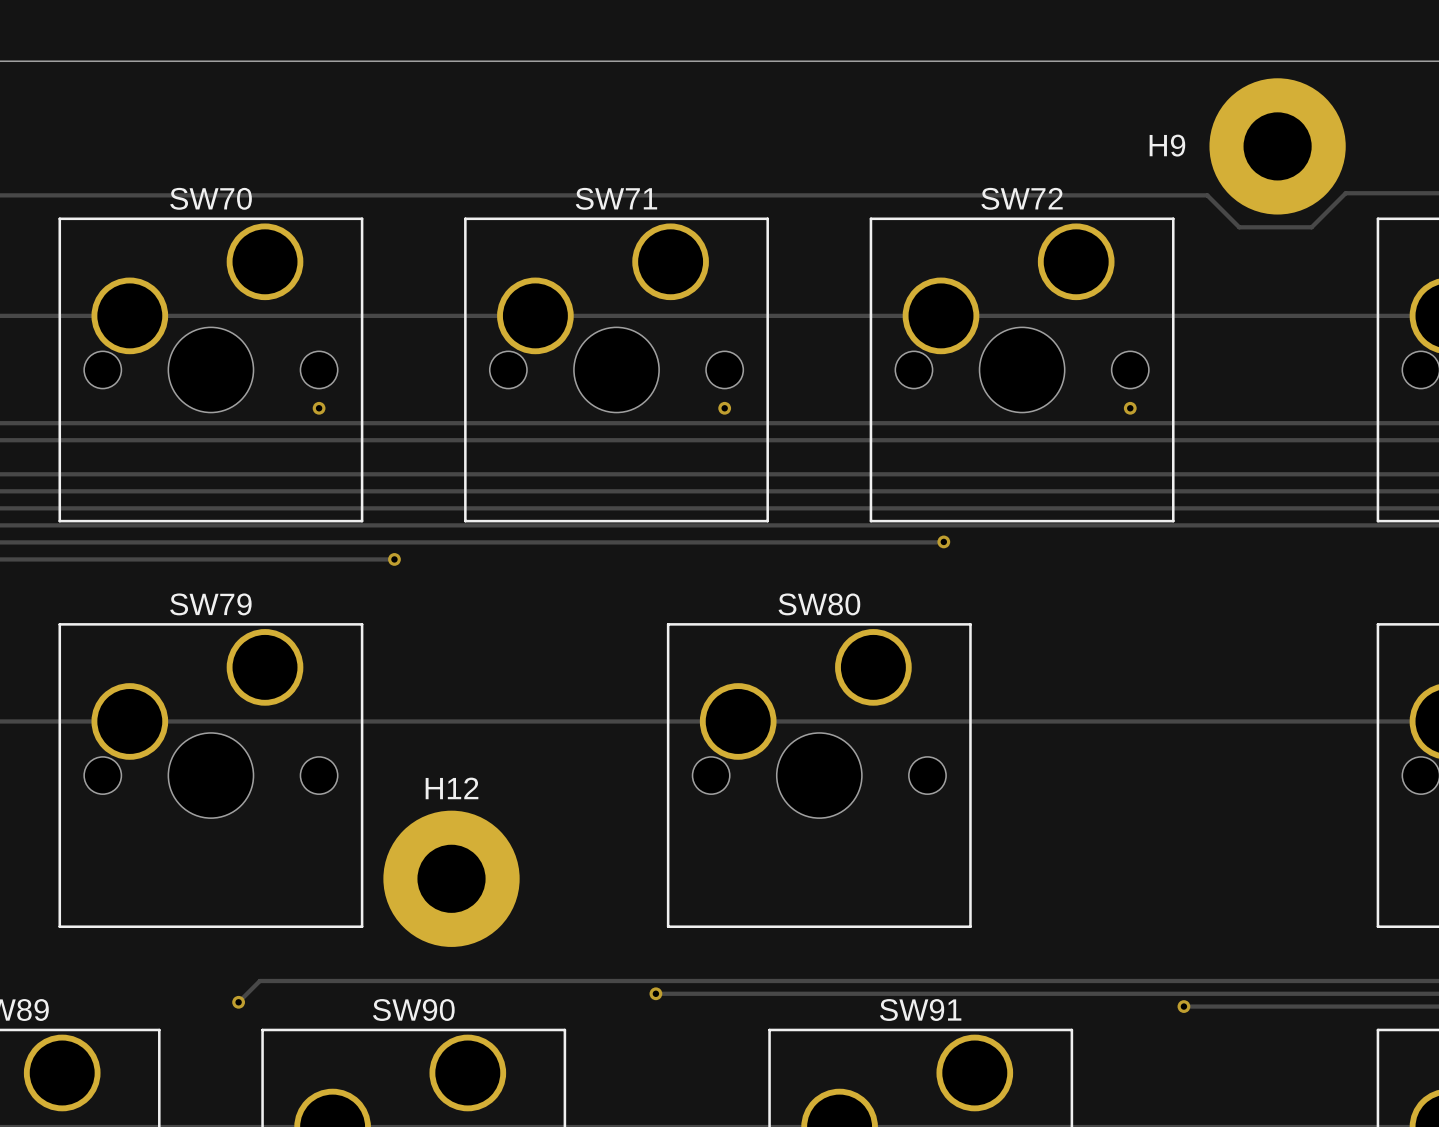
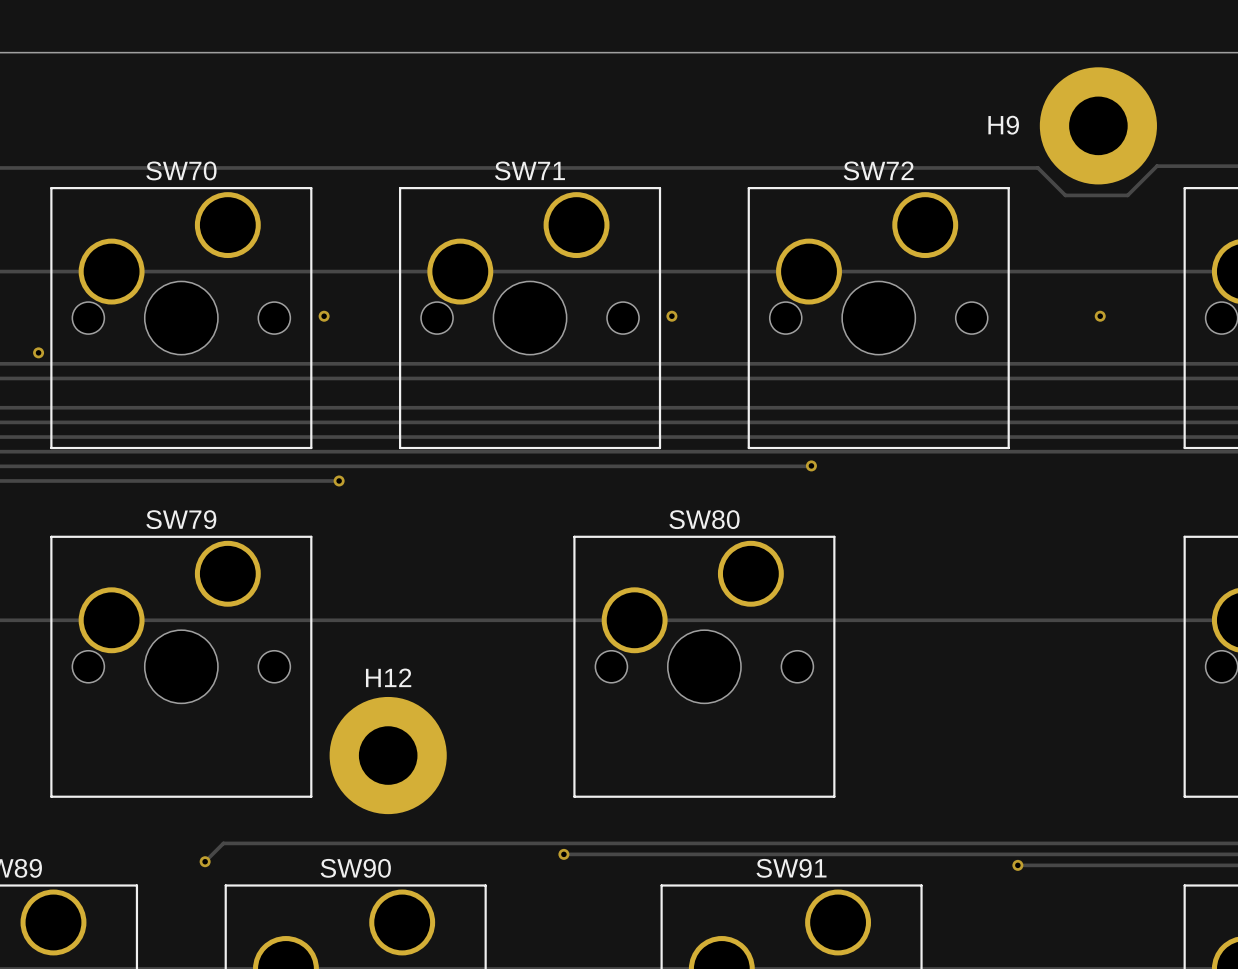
via: none -> (1100, 316)
via position: (319, 408) -> (324, 316)
via position: (724, 408) -> (671, 316)
via: (1130, 408) -> none
via: none -> (38, 352)

